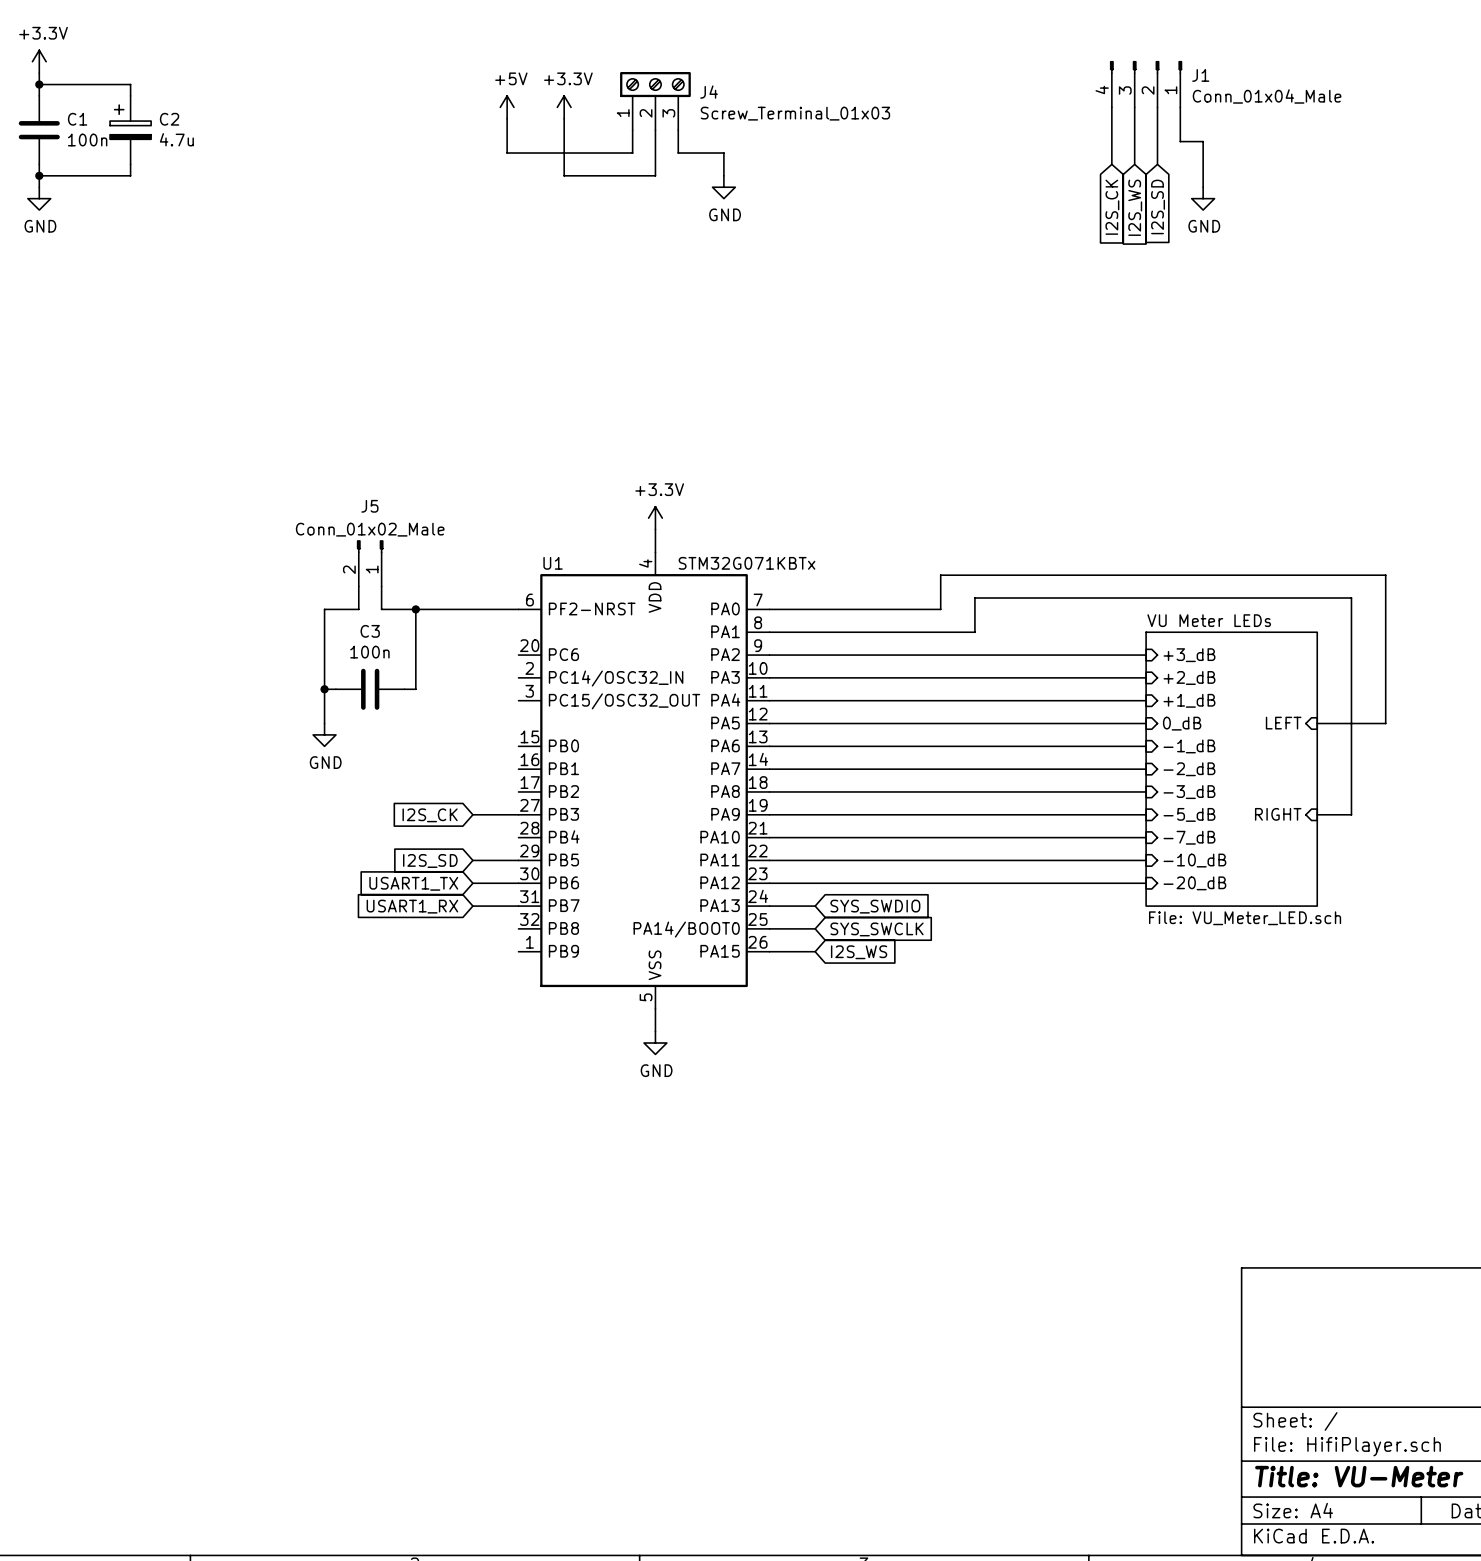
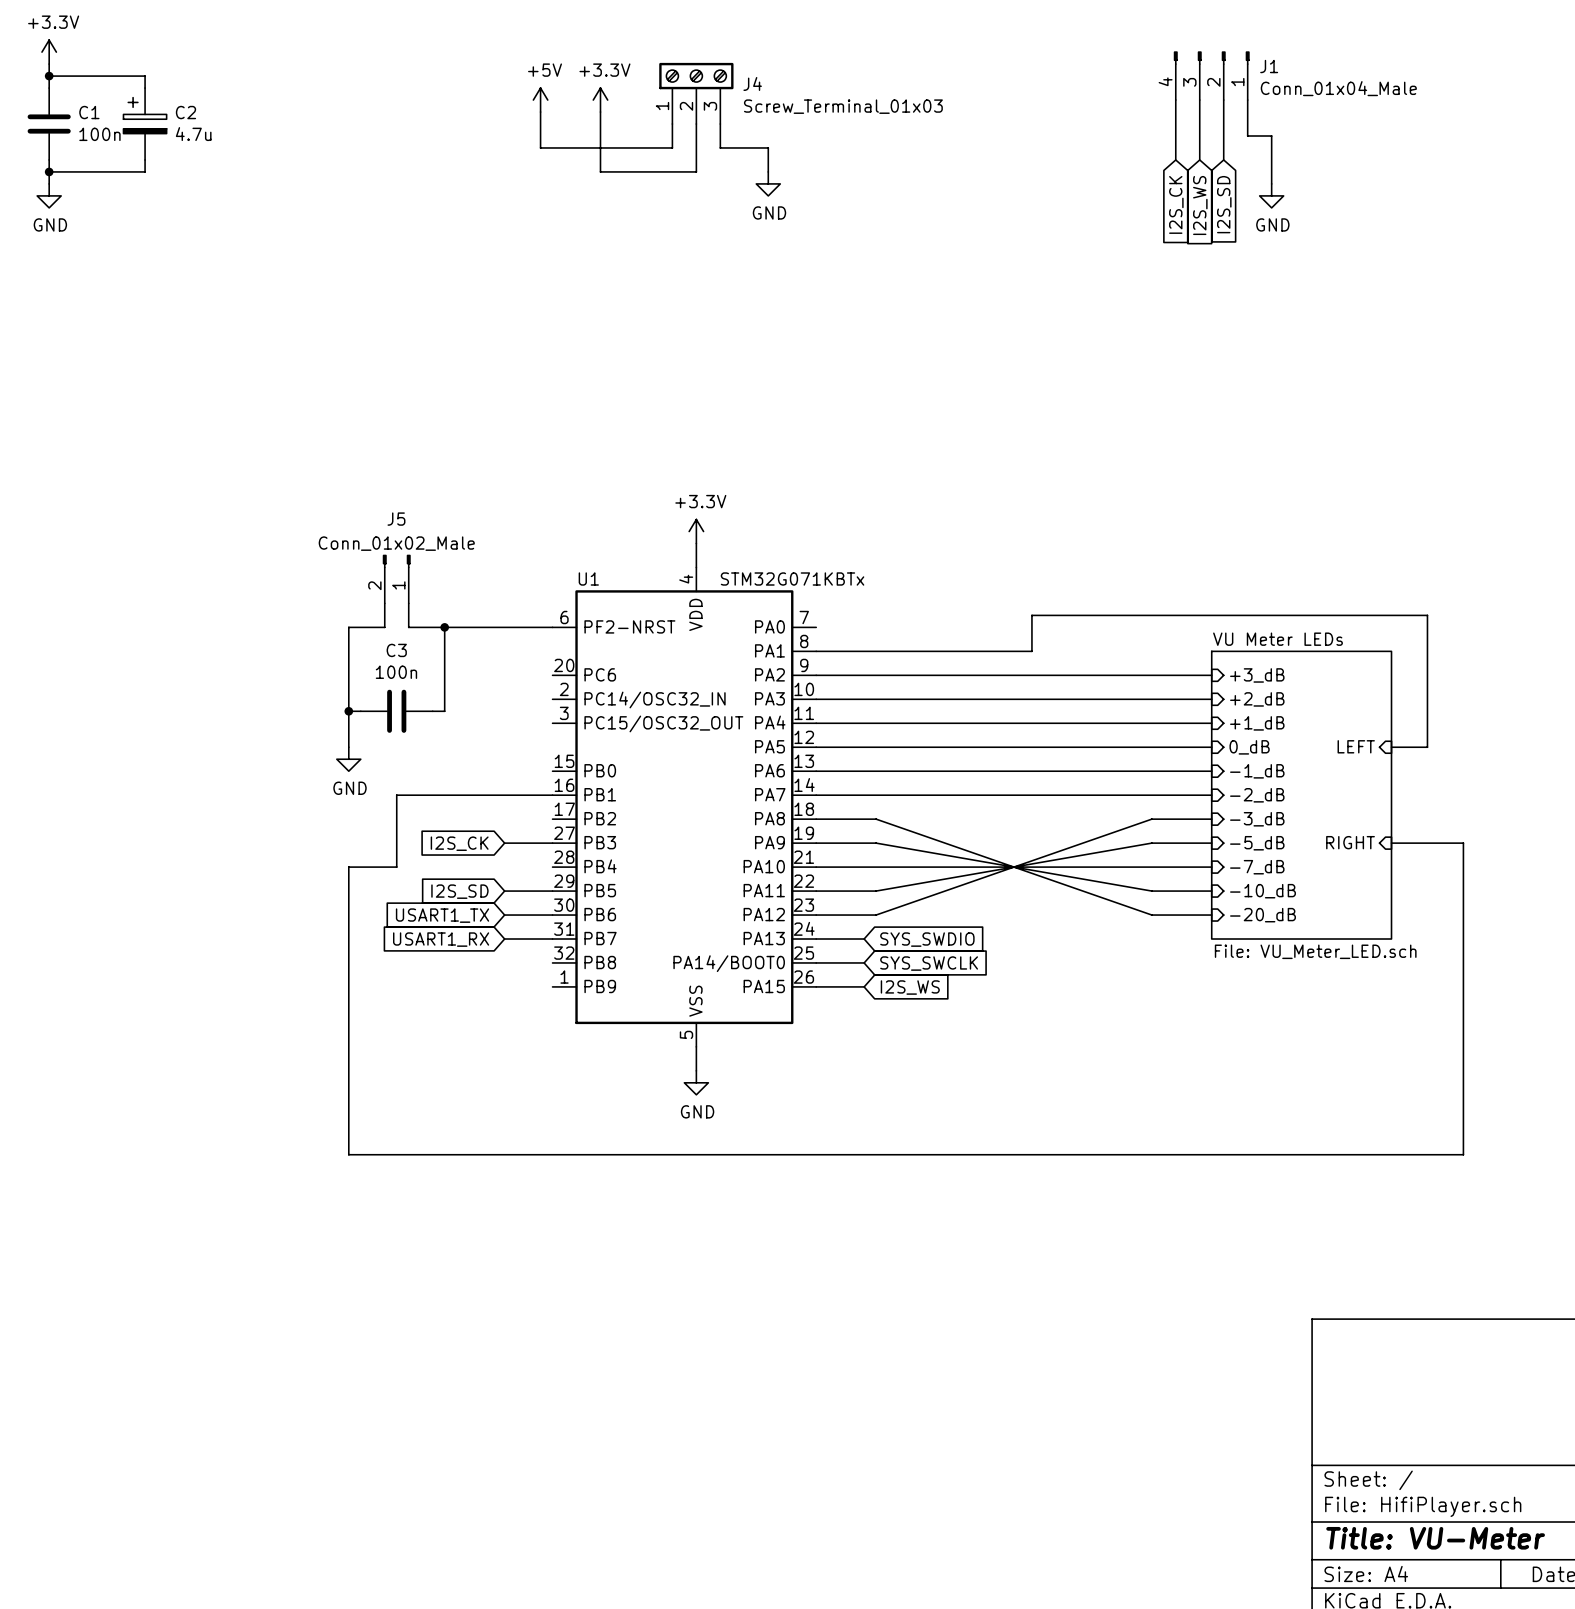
wire: (769, 609) (940, 609) (940, 575) (1385, 575) (1385, 723) (1351, 723) (1351, 814) -> (552, 795) (396, 795) (396, 867) (348, 867) (348, 1154) (1463, 1154) (1463, 843) (1427, 843)
wire: (826, 791) (1089, 791) -> (876, 819) (1151, 915)
wire: (826, 814) (1089, 814) -> (876, 843) (1151, 891)
wire: (826, 860) (1089, 860) -> (876, 891) (1151, 843)
wire: (826, 883) (1089, 883) -> (876, 915) (1151, 819)

